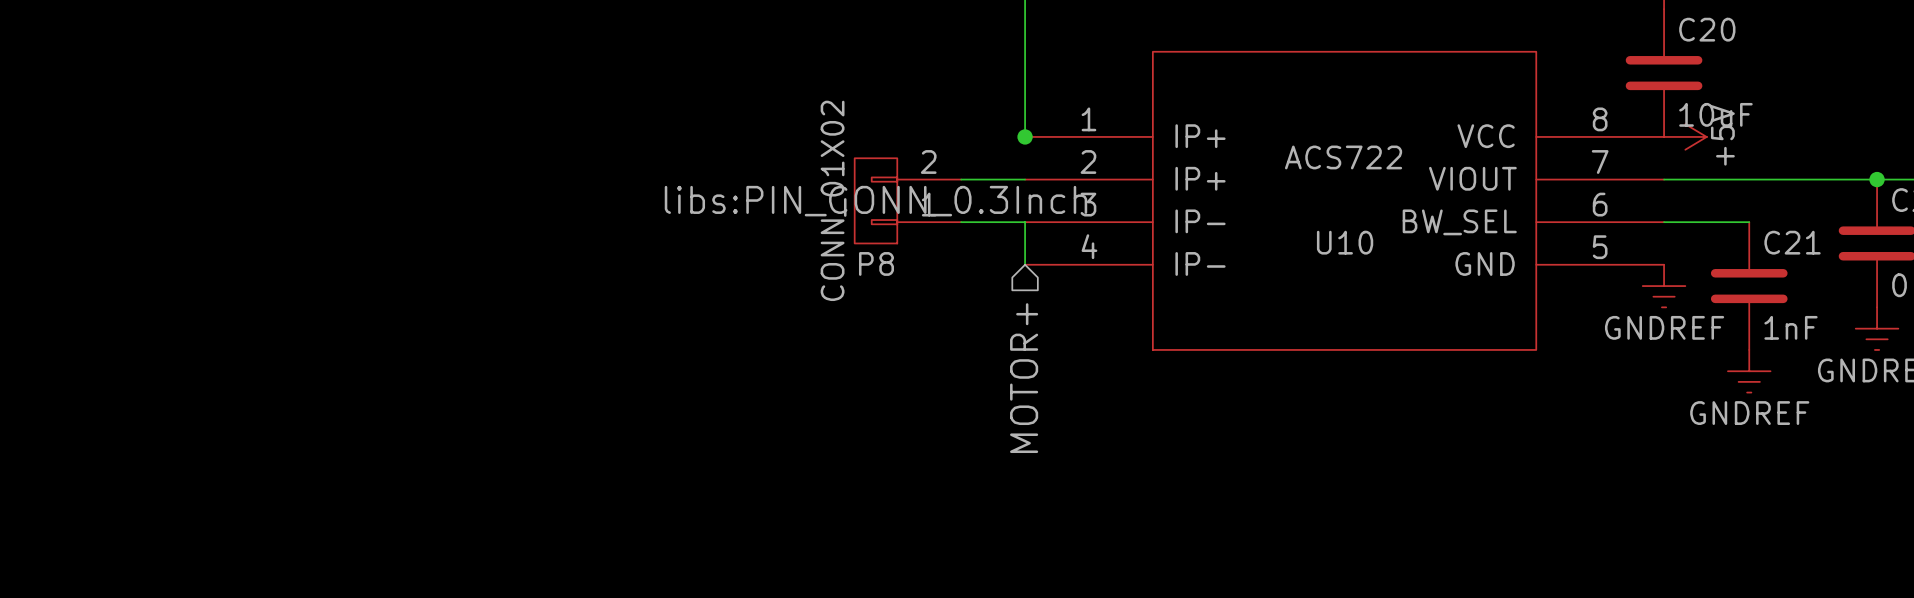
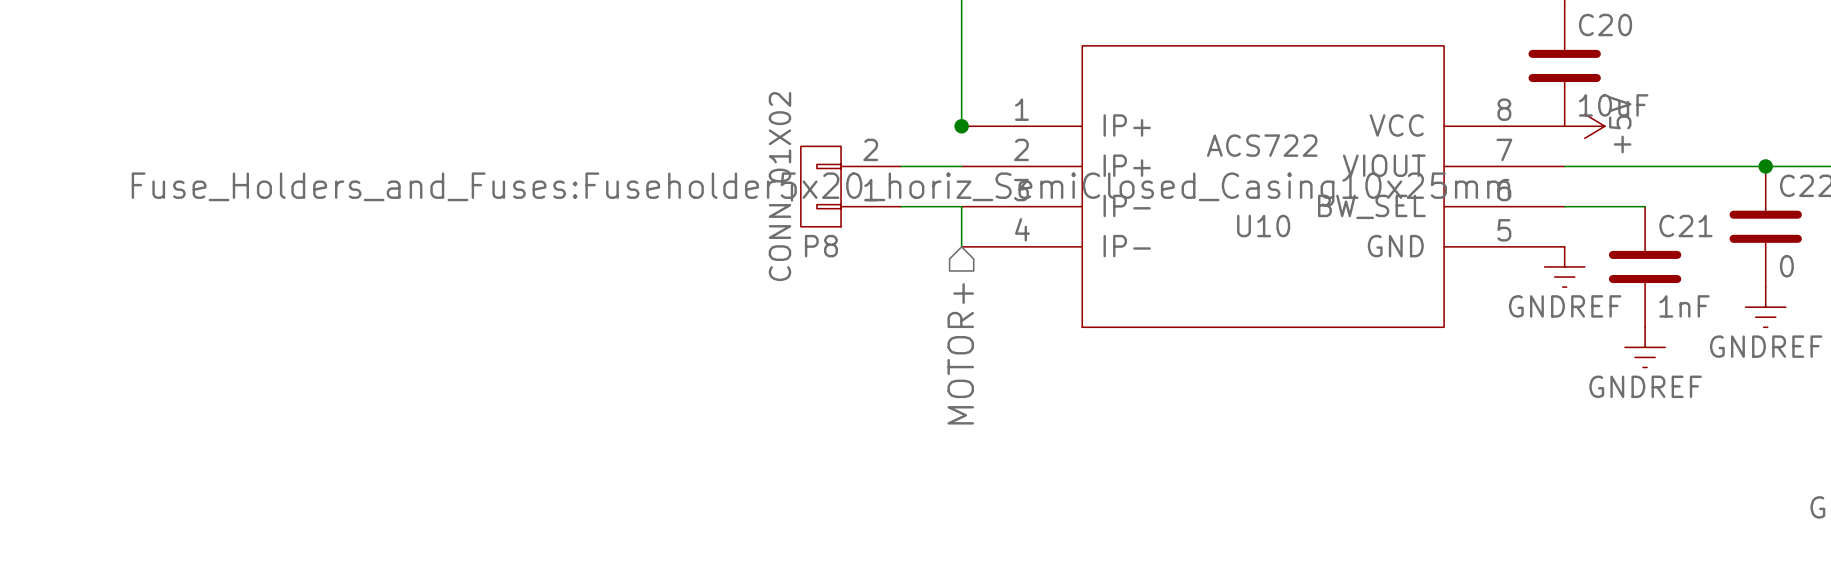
P8 text: libs:PIN_CONN_0.3Inch (875, 201) -> Fuse_Holders_and_Fuses:Fuseholder5x20_horiz_SemiClosed_Casing10x25mm (820, 189)

